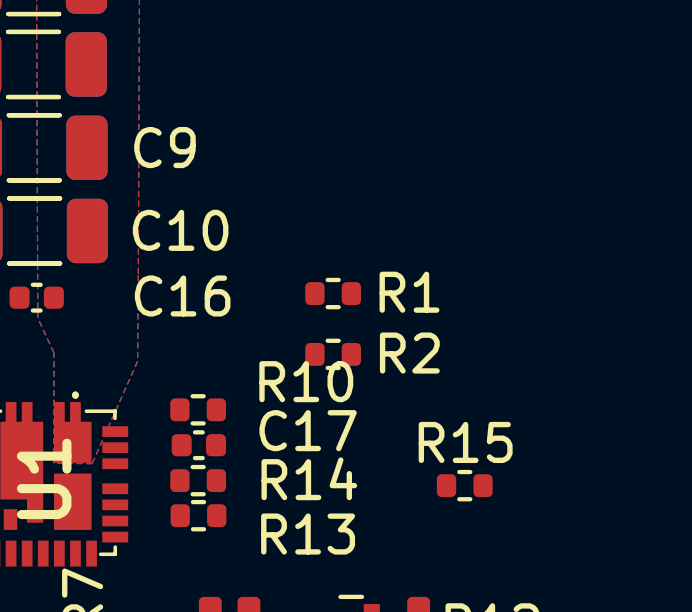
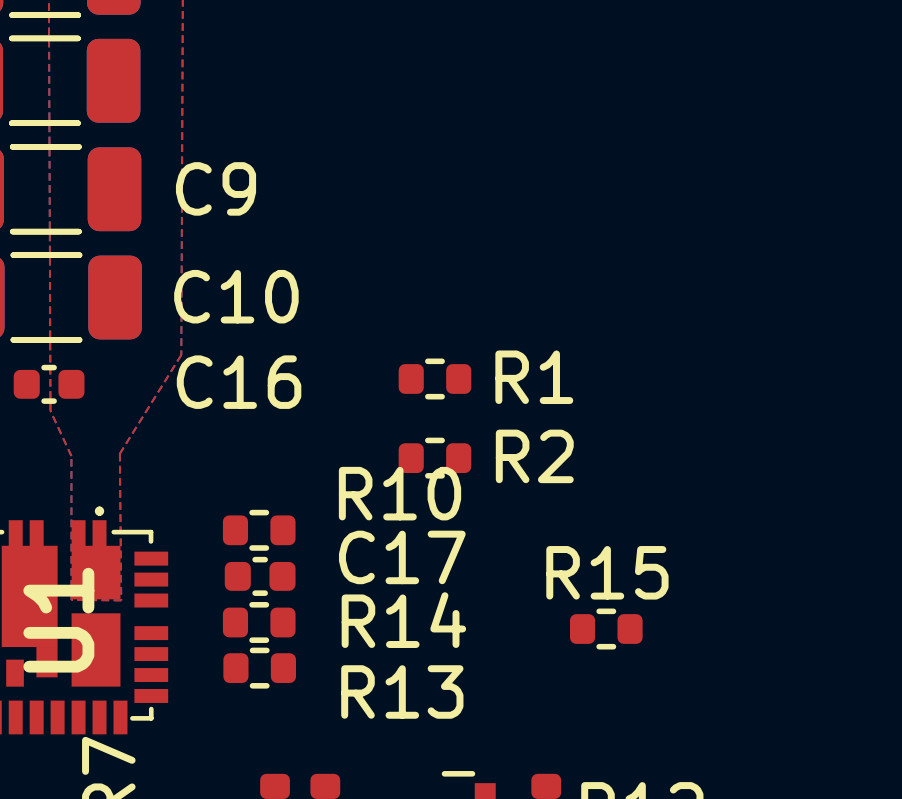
top zone outline: (138, 275) (137, 361) (92, 463) -> (181, 355) (119, 453) (121, 600)

